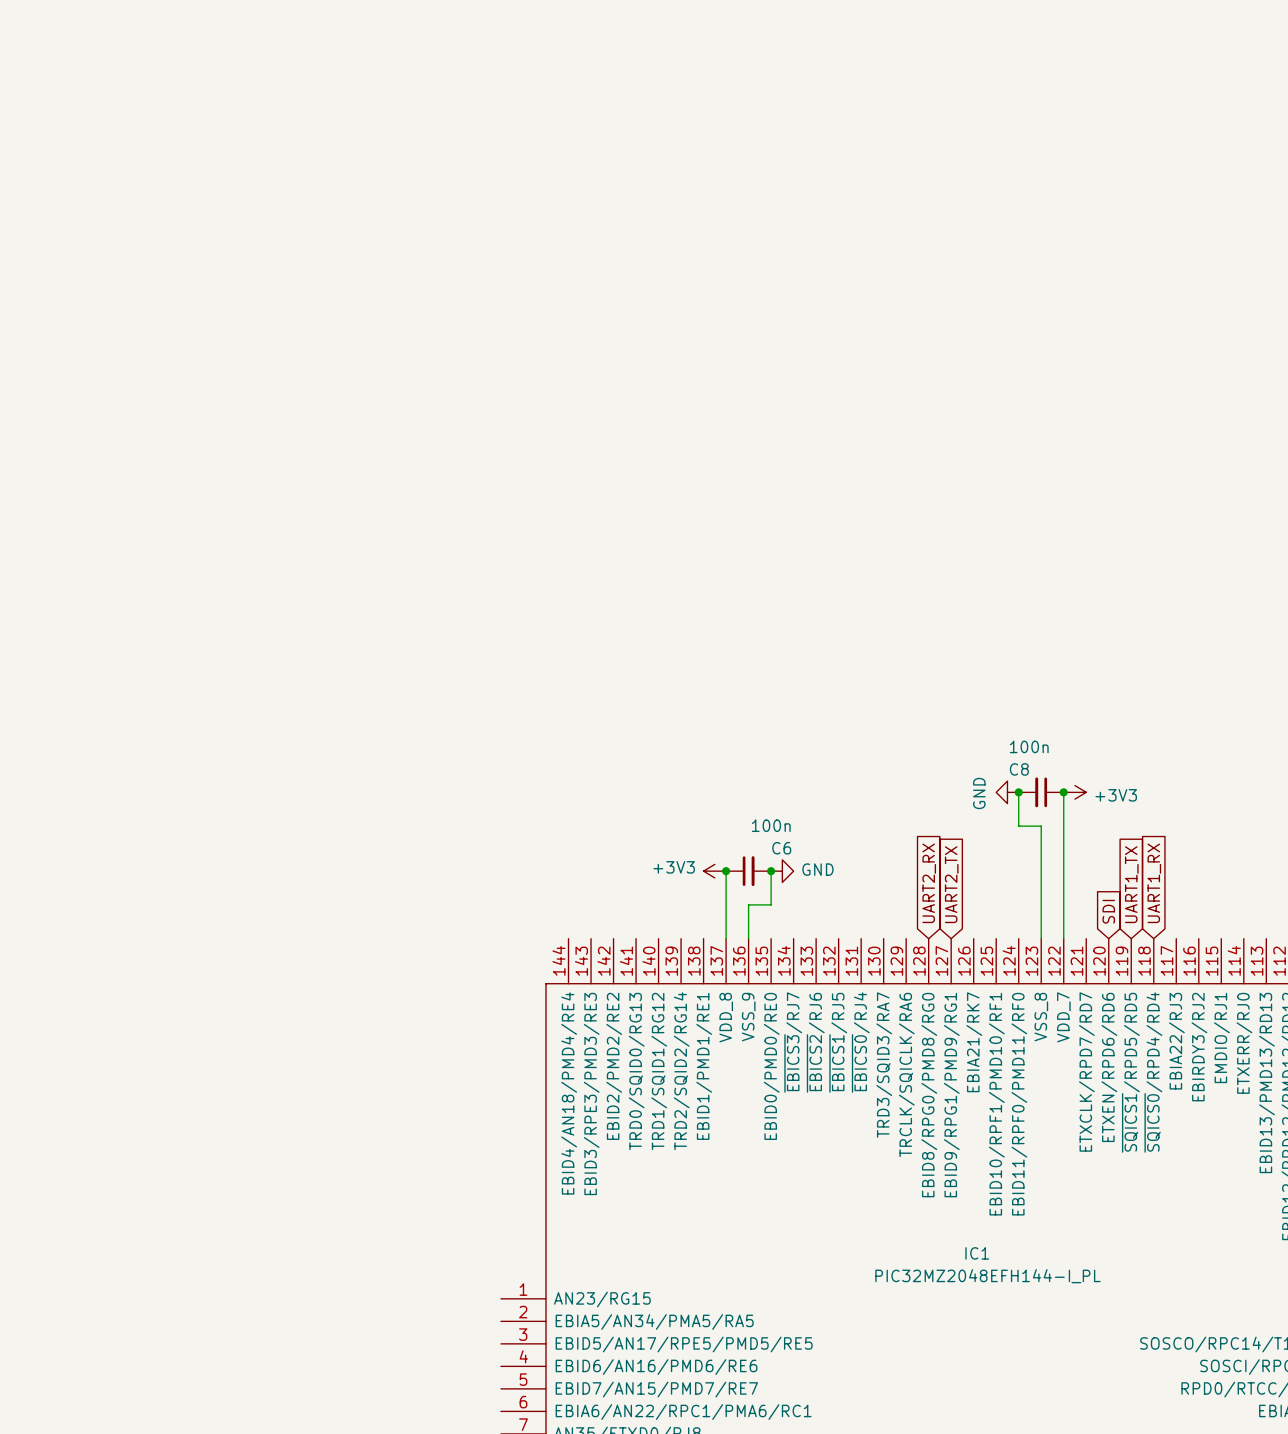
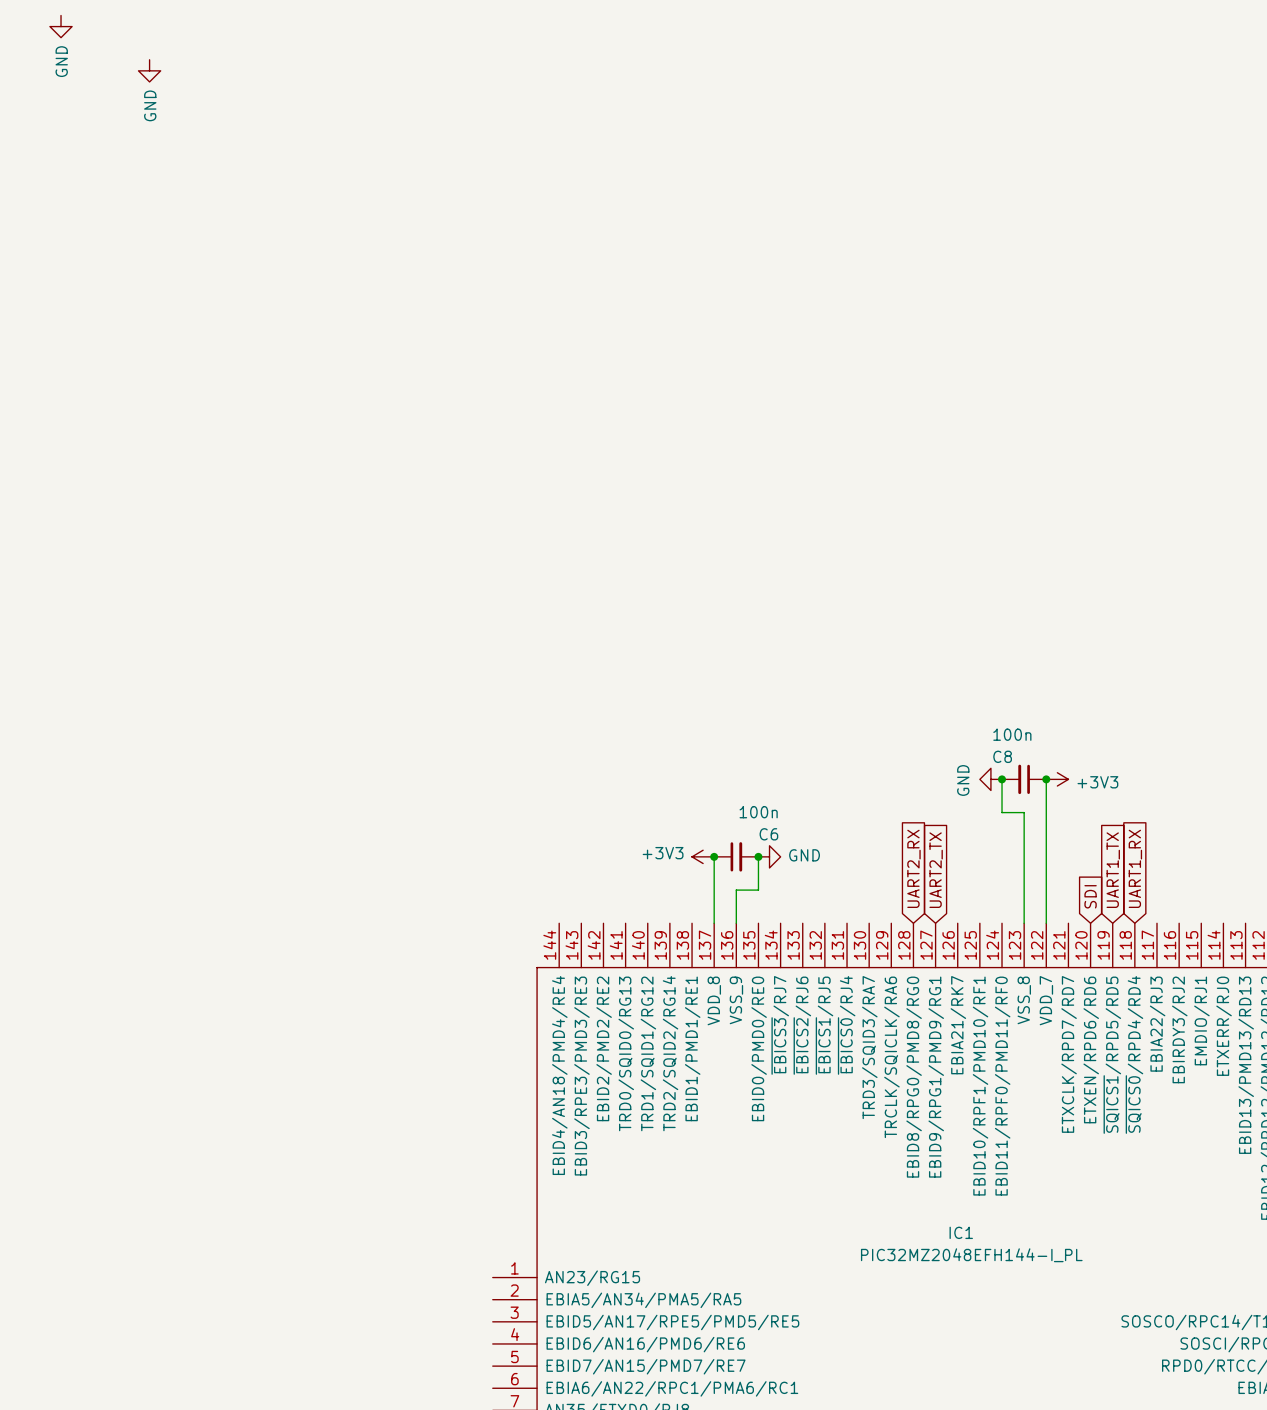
power symbol: none -> GND (61, 26)
power symbol: none -> GND (149, 70)

